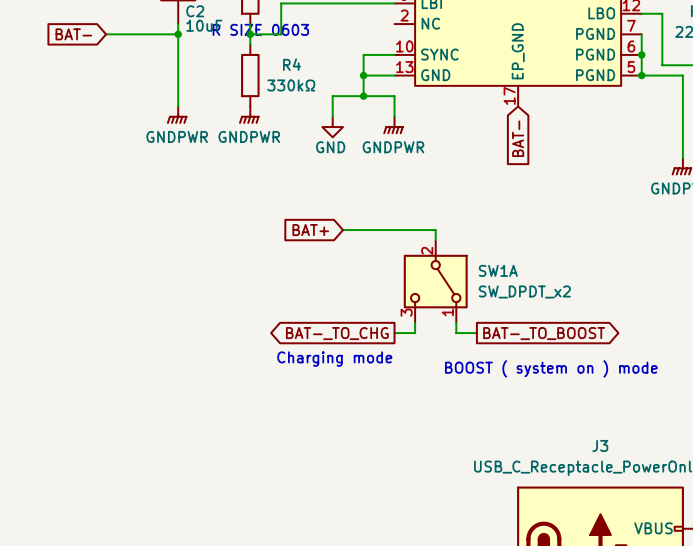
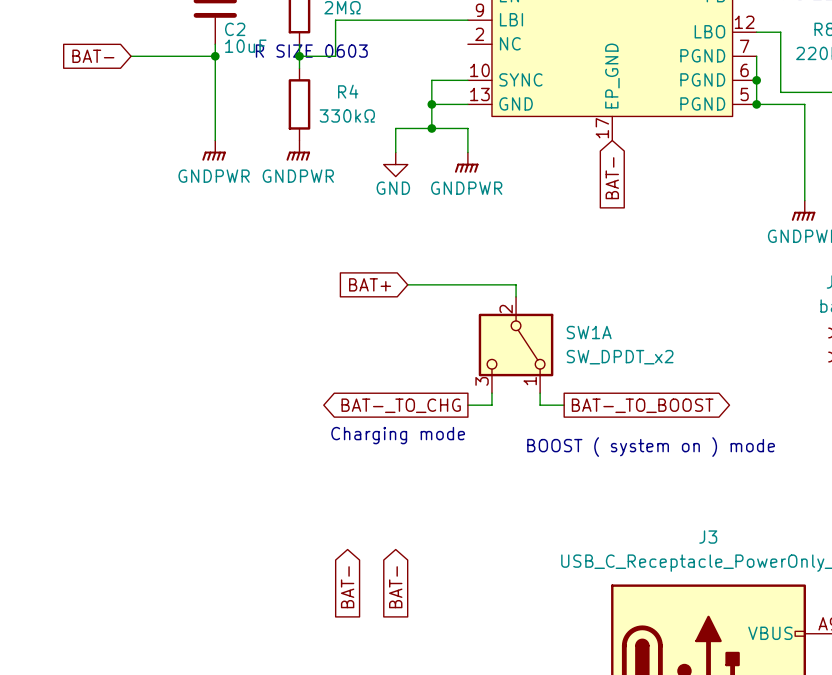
global label: none -> BAT- (347, 587)
global label: none -> BAT- (395, 587)

